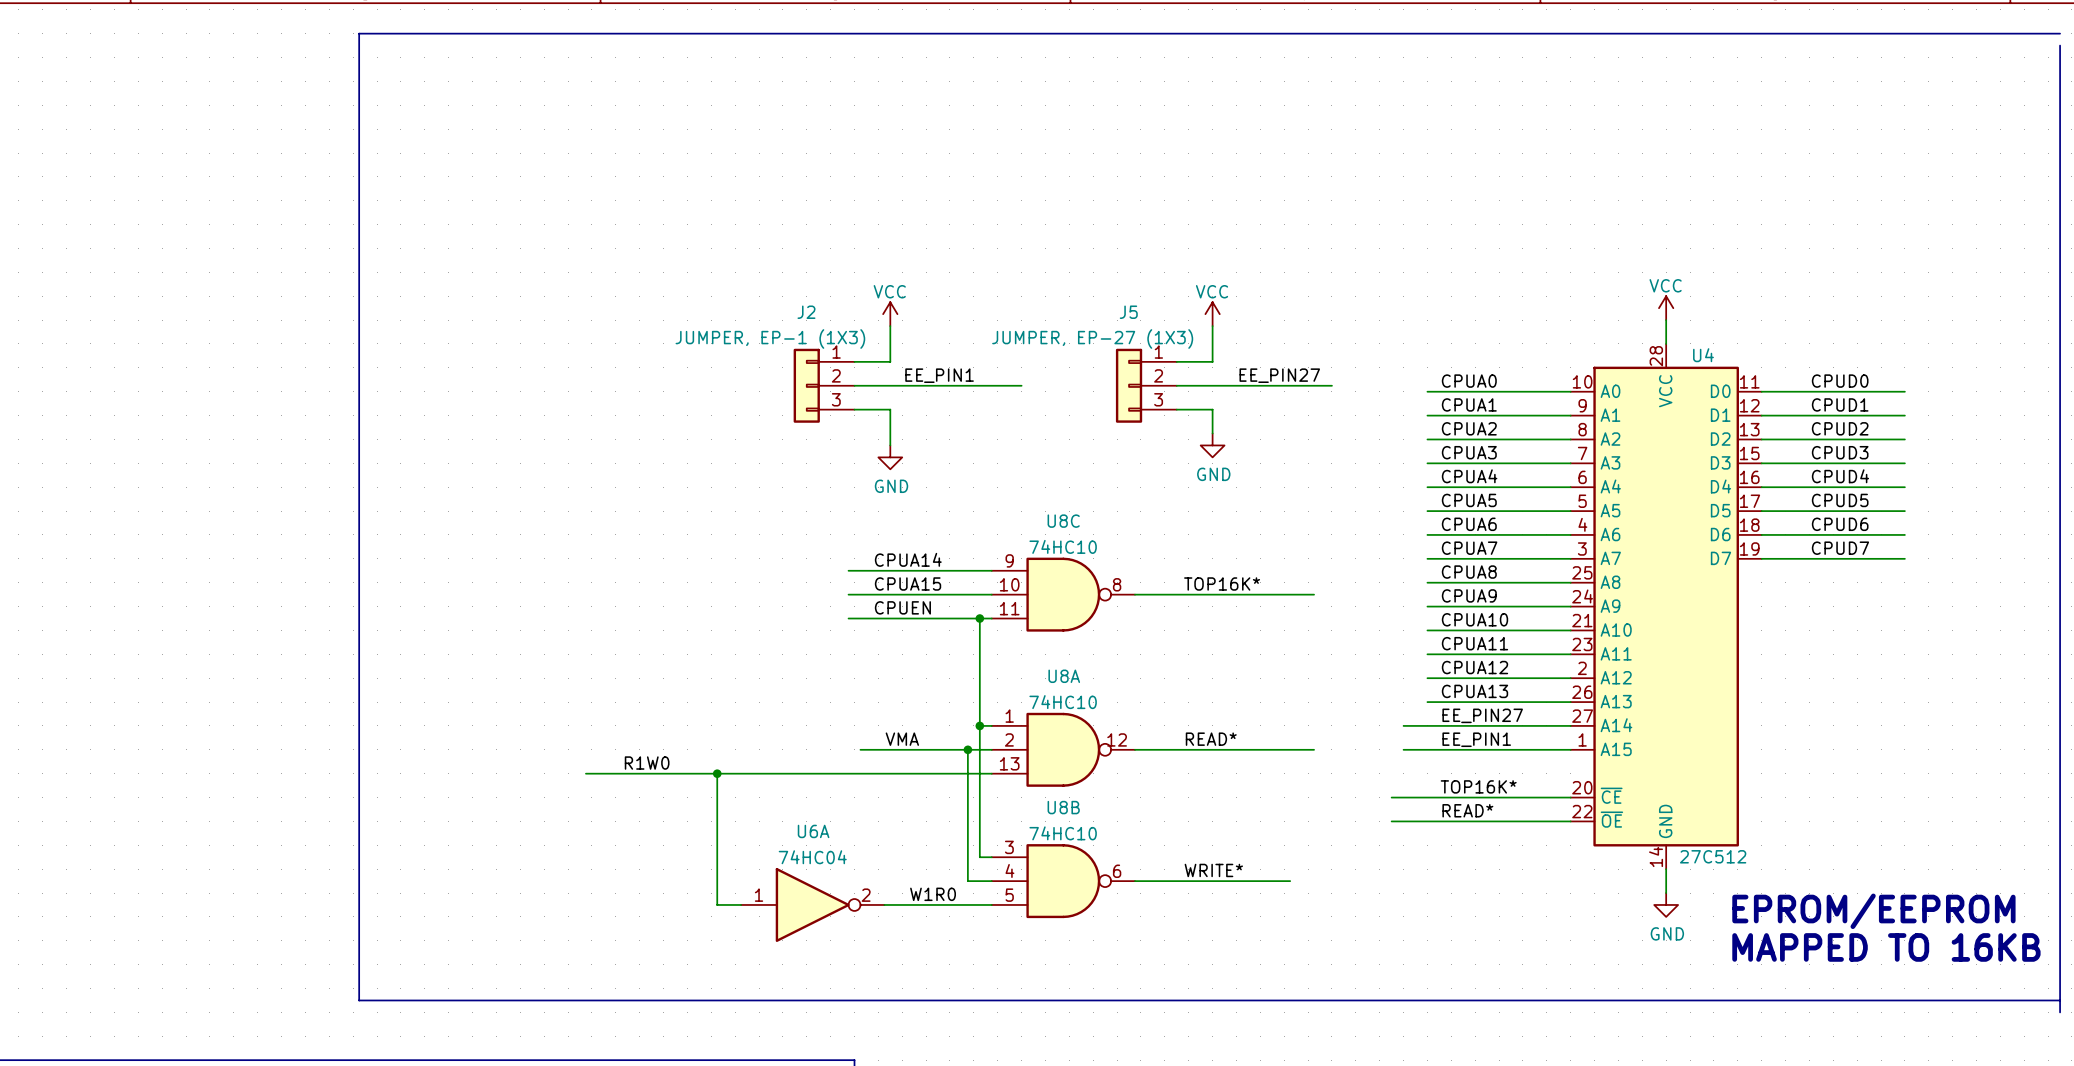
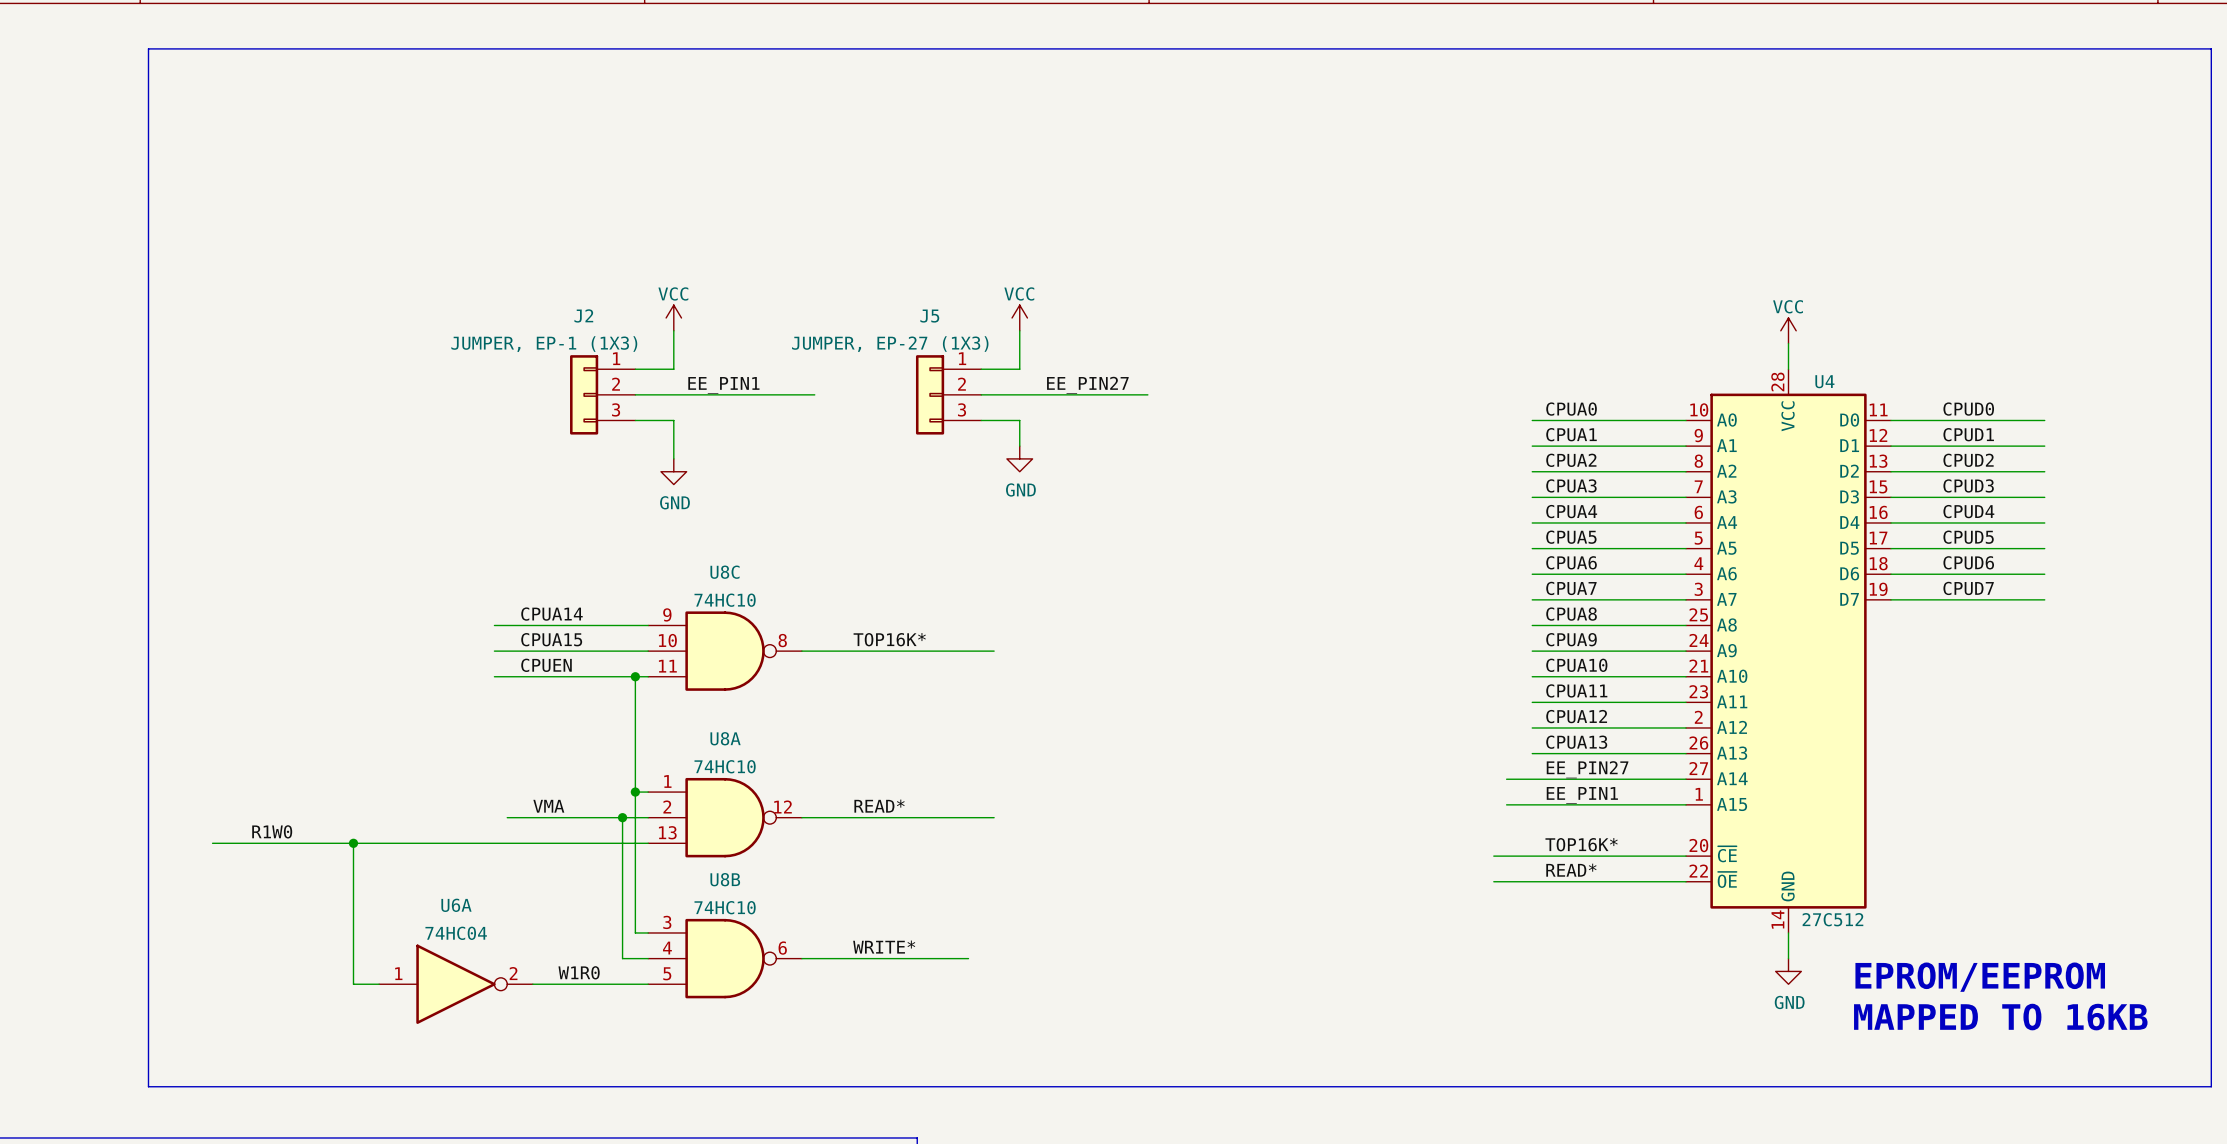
line: (2060, 33) (359, 33) (359, 1000) (2060, 1000) -> none
line: none -> (2211, 48) (148, 48) (148, 1086) (2211, 1086)
power symbol: none -> VCC (673, 317)
wire: none -> (673, 330) (673, 369) (635, 369)
power symbol position: VCC (890, 314) -> VCC (1019, 317)
power symbol: VCC (1212, 314) -> none
wire: (890, 326) (890, 361) (854, 361) -> (1019, 330) (1019, 369) (981, 369)
wire: (1212, 326) (1212, 361) (1176, 361) -> none
label: none -> EE_PIN1 (723, 385)
wire: none -> (635, 394) (814, 394)
wire: none -> (981, 394) (1147, 394)
label: EE_PIN1 (939, 375) -> EE_PIN27 (1087, 385)
label: EE_PIN27 (1279, 375) -> none
J2 position: (824, 385) -> (602, 394)
wire: (854, 385) (1021, 385) -> none
J5 position: (1146, 385) -> (948, 394)
wire: (1176, 385) (1331, 385) -> none
wire: none -> (635, 420) (673, 420) (673, 458)
wire: none -> (981, 420) (1019, 420) (1019, 446)
wire: (854, 409) (890, 409) (890, 445) -> none
wire: (1176, 409) (1212, 409) (1212, 433) -> none
power symbol: none -> GND (673, 471)
power symbol: GND (1212, 445) -> none
power symbol position: GND (890, 457) -> GND (1019, 458)
label: CPUA14 (908, 559) -> none
wire: (848, 570) (991, 570) -> none
label: none -> CPUA14 (551, 614)
wire: none -> (494, 625) (648, 625)
label: CPUA15 (908, 583) -> none
label: TOP16K* (1222, 583) -> none
wire: (848, 594) (991, 594) -> none
U8C position: (1063, 594) -> (725, 651)
wire: (1135, 594) (1314, 594) -> none
label: none -> CPUA15 (551, 639)
label: none -> TOP16K* (889, 639)
wire: none -> (494, 651) (648, 651)
wire: none -> (801, 651) (994, 651)
label: CPUEN (902, 607) -> none
wire: (848, 618) (991, 618) -> none
wire: (979, 618) (979, 857) (991, 857) -> none
junction: (979, 618) -> none
label: none -> CPUEN (546, 665)
wire: none -> (494, 676) (648, 676)
wire: none -> (635, 676) (635, 932) (648, 932)
junction: none -> (635, 676)
wire: (979, 725) (991, 725) -> none
junction: (979, 725) -> none
wire: none -> (635, 792) (648, 792)
junction: none -> (635, 792)
label: VMA (902, 739) -> none
label: READ* (1211, 739) -> none
wire: (860, 749) (991, 749) -> none
wire: (967, 749) (967, 881) (991, 881) -> none
junction: (967, 749) -> none
U8A position: (1063, 749) -> (725, 817)
wire: (1135, 749) (1314, 749) -> none
label: none -> VMA (548, 806)
label: none -> READ* (879, 806)
wire: none -> (507, 817) (648, 817)
junction: none -> (622, 817)
wire: none -> (801, 817) (994, 817)
label: R1W0 (647, 763) -> none
wire: (585, 773) (991, 773) -> none
wire: (717, 773) (717, 904) (741, 904) -> (622, 817) (622, 958) (648, 958)
junction: (717, 773) -> none
label: none -> R1W0 (272, 831)
wire: none -> (212, 843) (648, 843)
wire: none -> (353, 843) (353, 984) (379, 984)
junction: none -> (353, 843)
label: WRITE* (1213, 870) -> none
U8B position: (1063, 881) -> (725, 958)
wire: (1135, 881) (1290, 881) -> none
label: none -> WRITE* (884, 947)
wire: none -> (801, 958) (968, 958)
label: W1R0 (933, 894) -> none
U6A position: (812, 904) -> (455, 984)
wire: (884, 904) (991, 904) -> none
label: none -> W1R0 (579, 972)
wire: none -> (532, 984) (648, 984)

